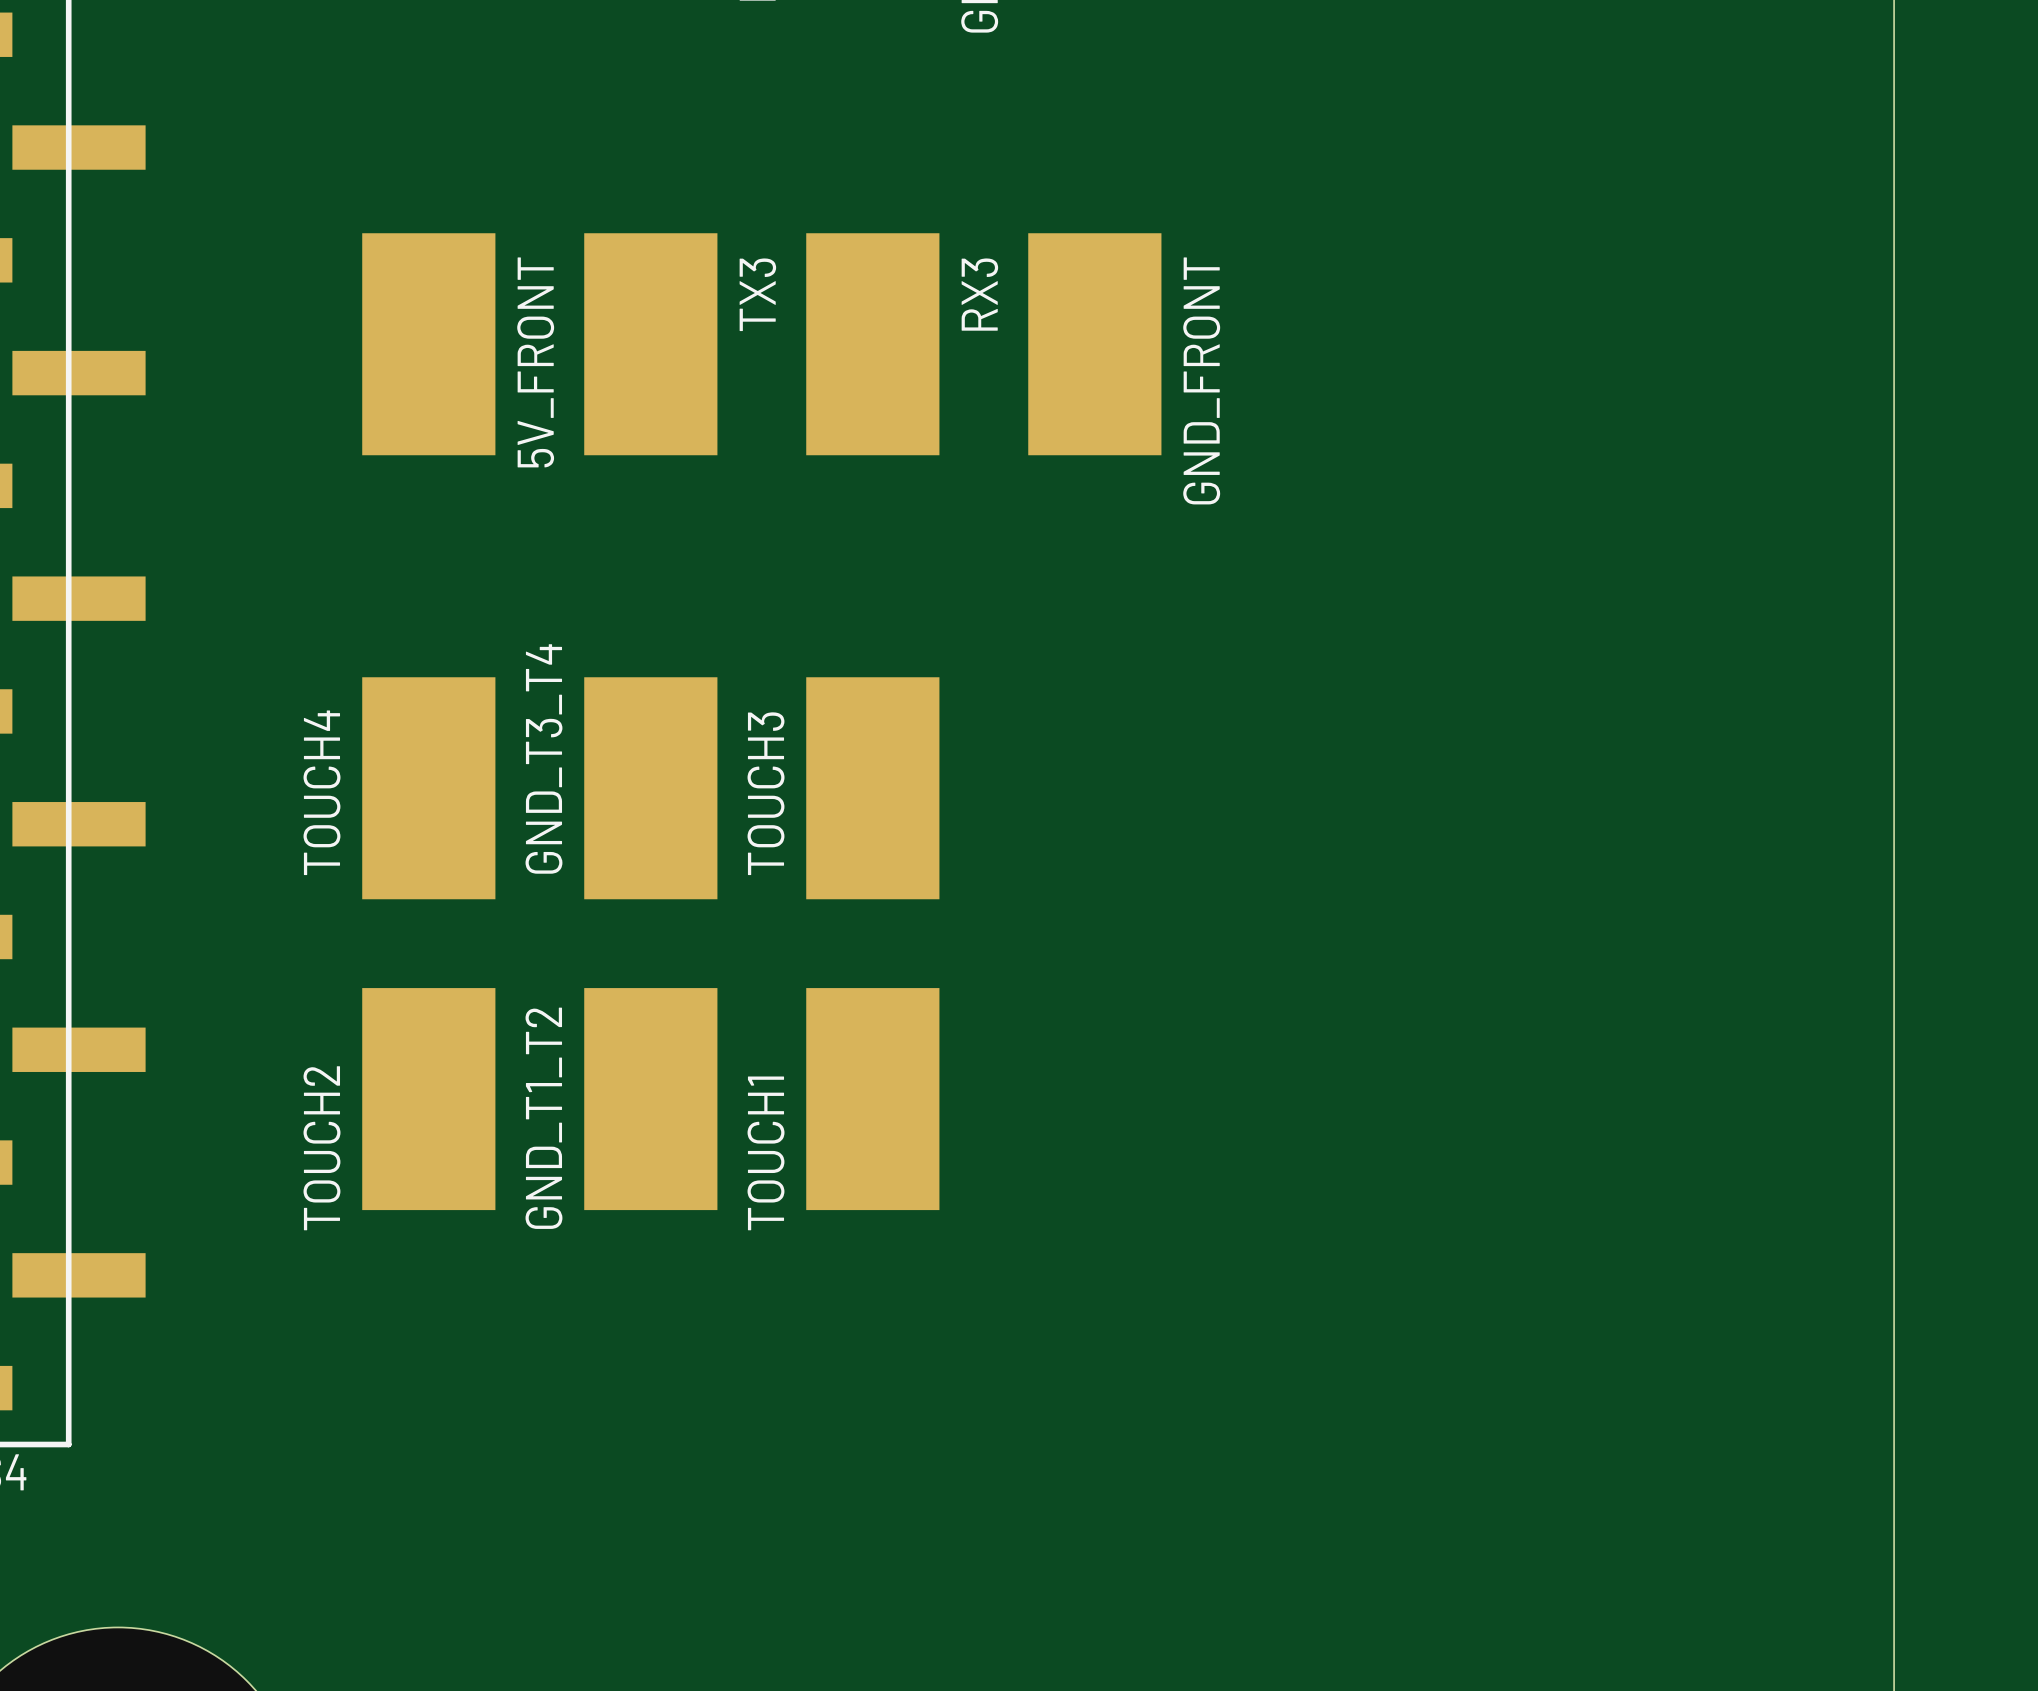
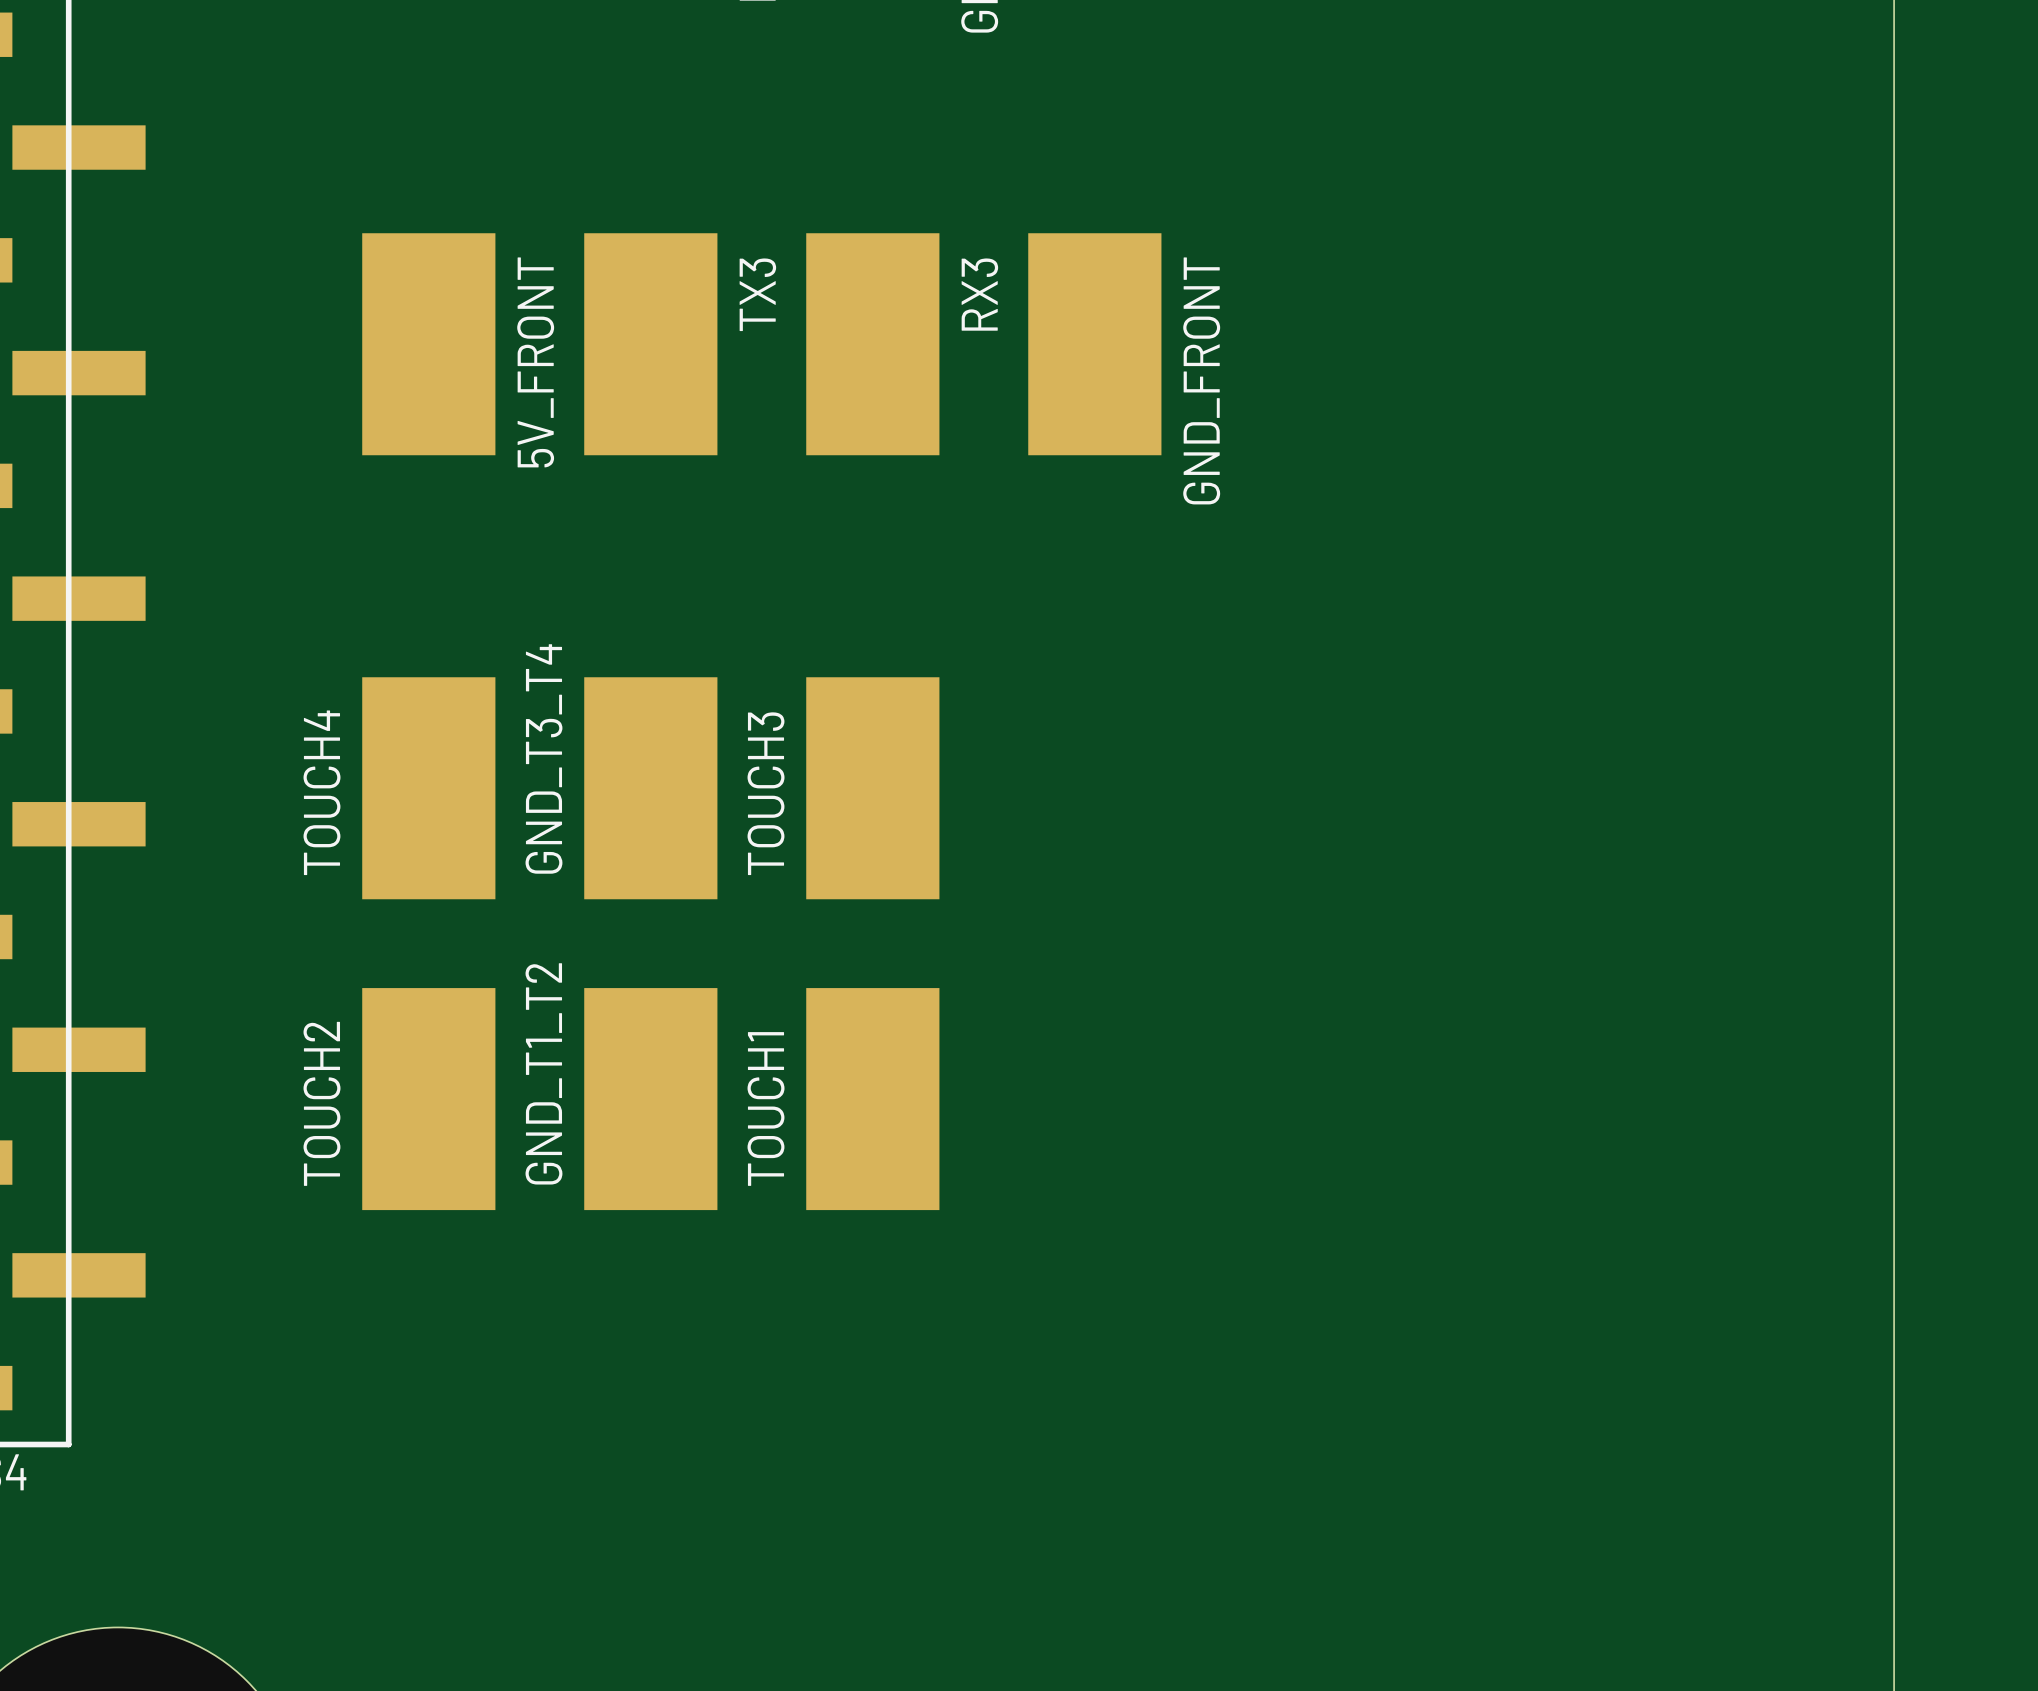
GND_T1_T2 name position: GND_T1_T2 (543, 1118) -> GND_T1_T2 (543, 1073)
TOUCH2 name position: TOUCH2 (322, 1148) -> TOUCH2 (322, 1103)
TOUCH1 name position: TOUCH1 (766, 1153) -> TOUCH1 (766, 1108)

